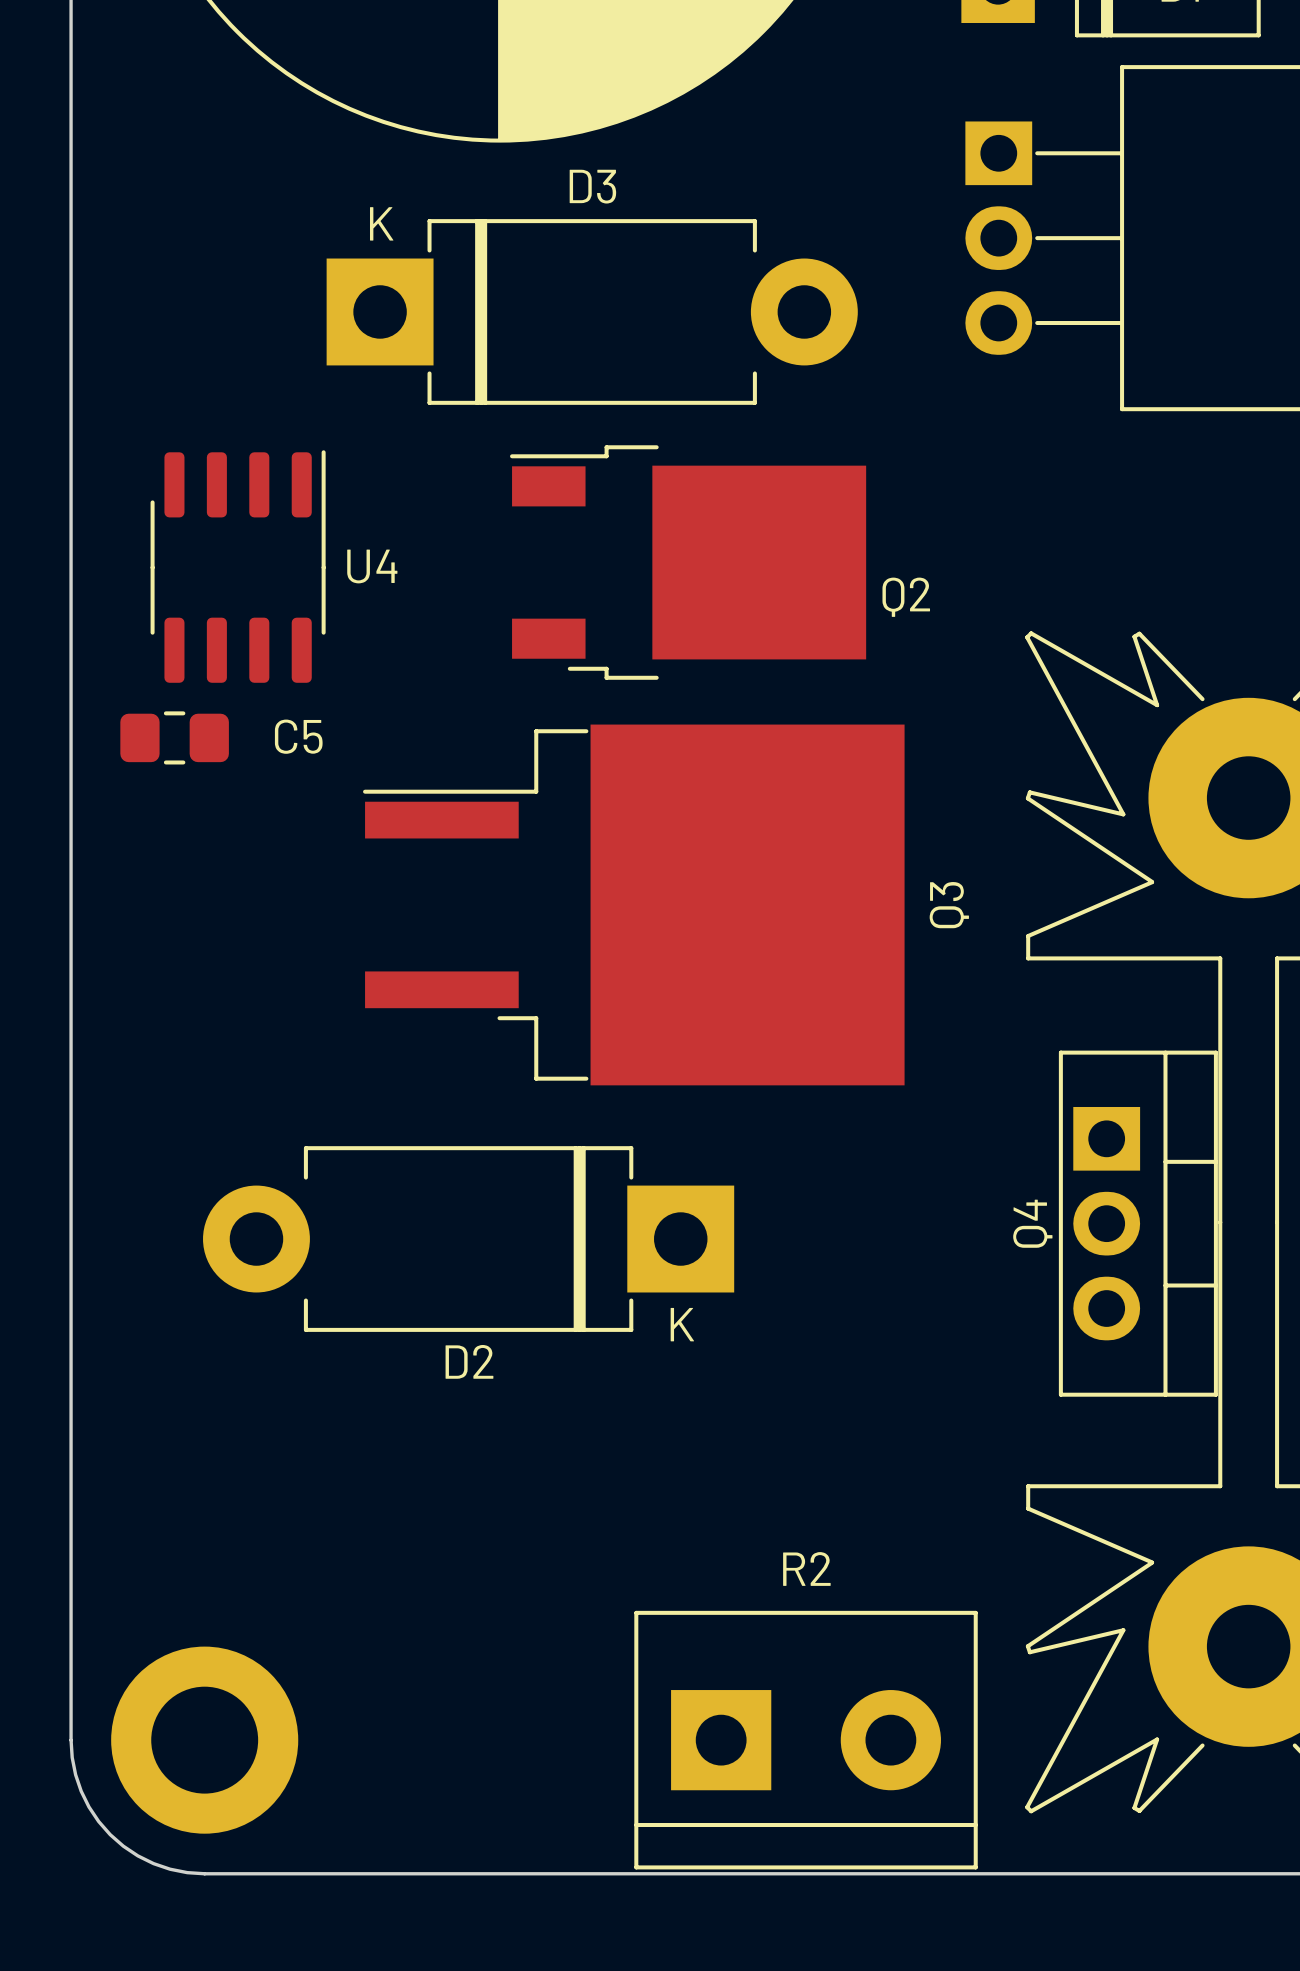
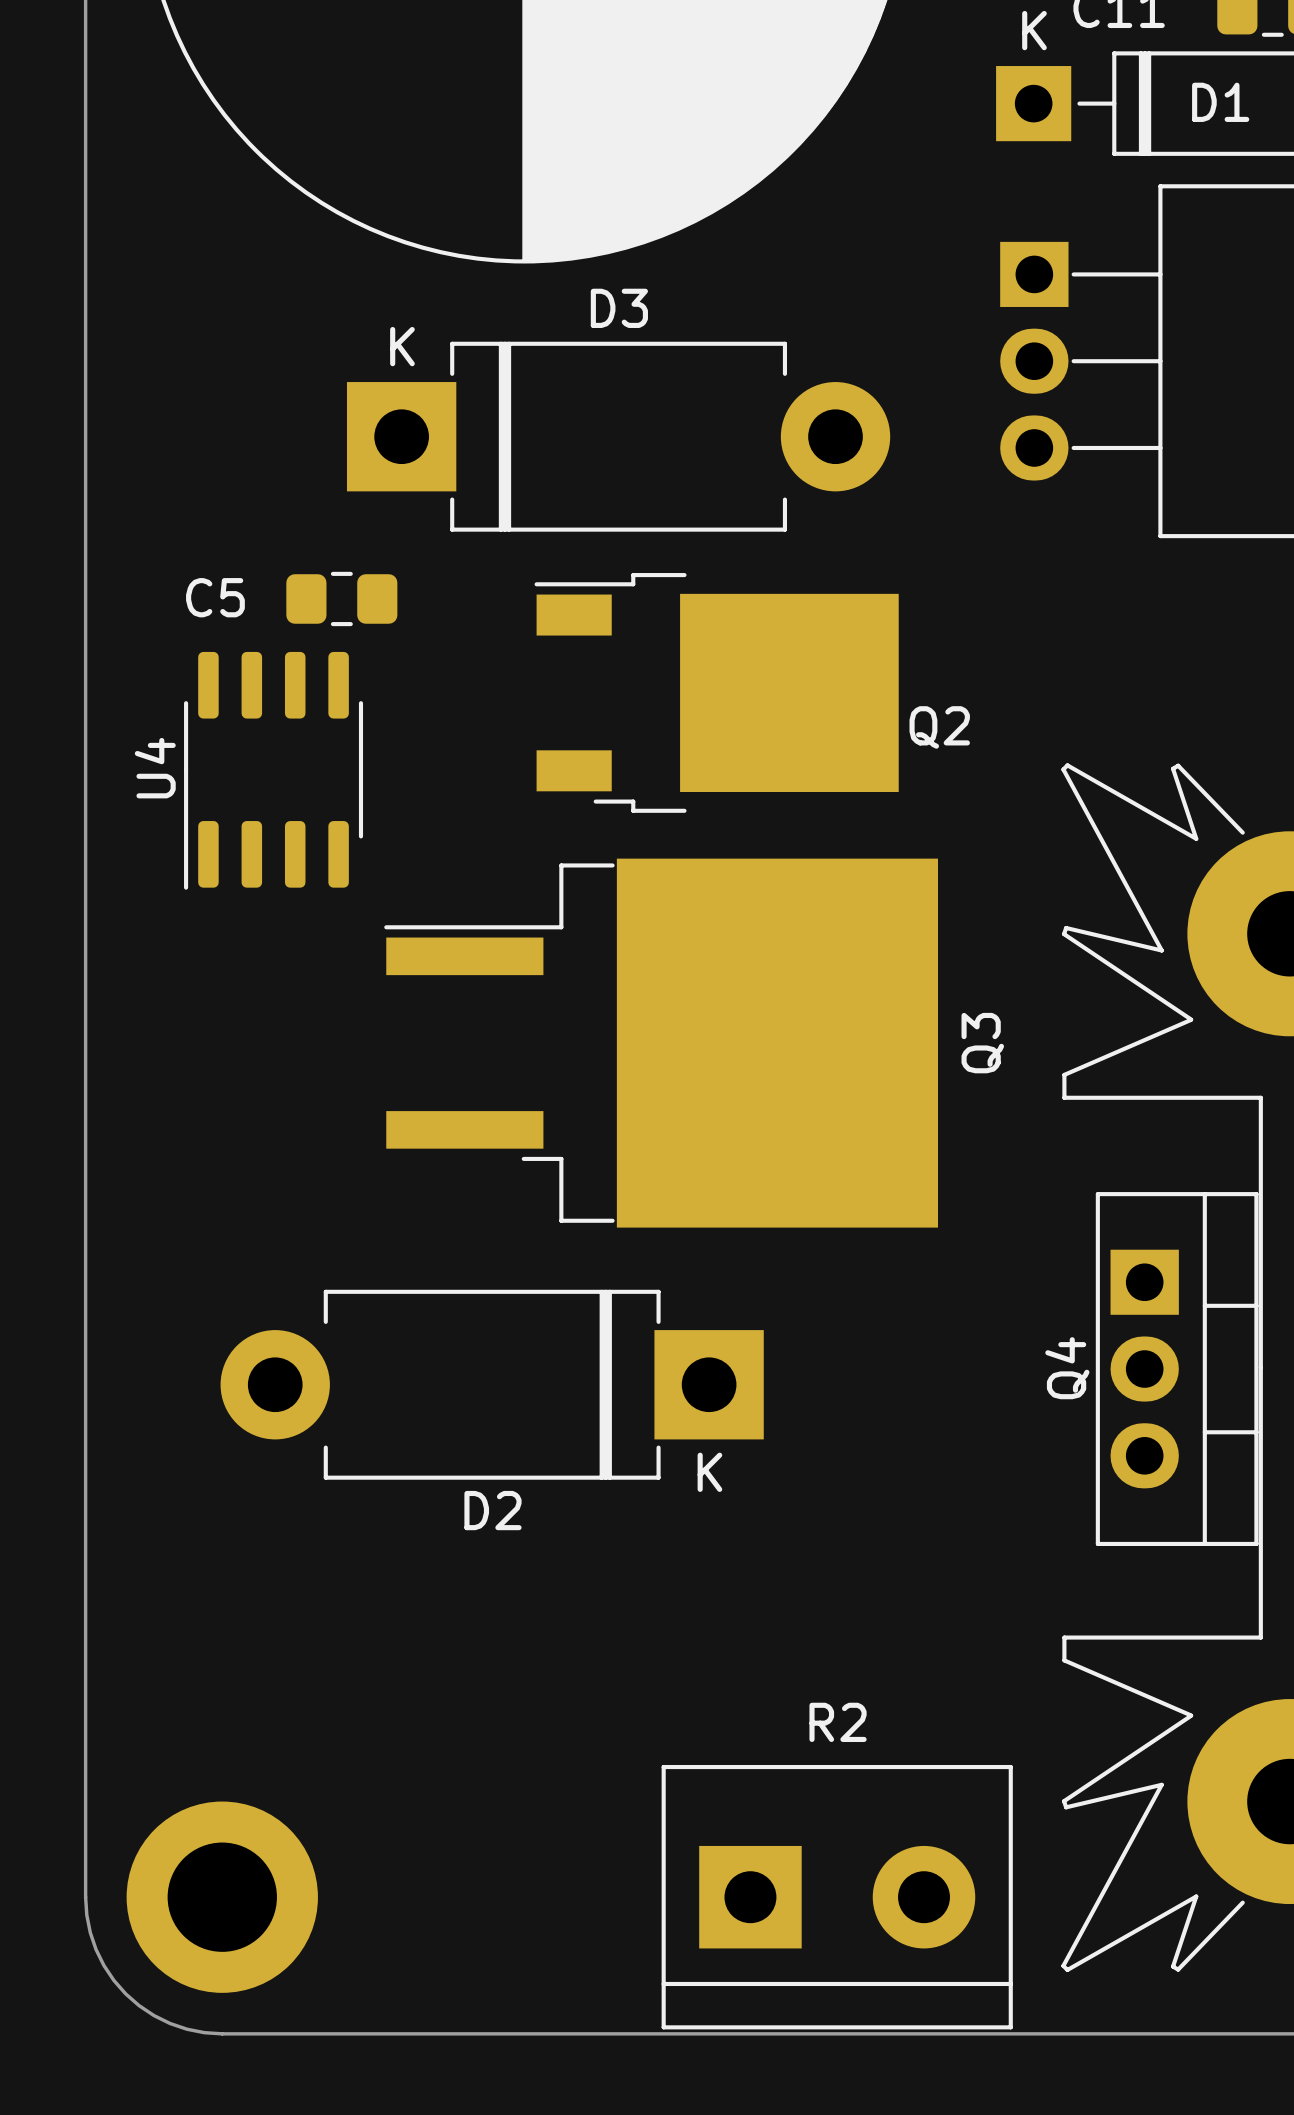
U4 rotation: 0° (238, 566) -> 180° (273, 770)
C5 name position: C5 (298, 736) -> C5 (215, 597)
C5 position: (174, 737) -> (341, 598)

